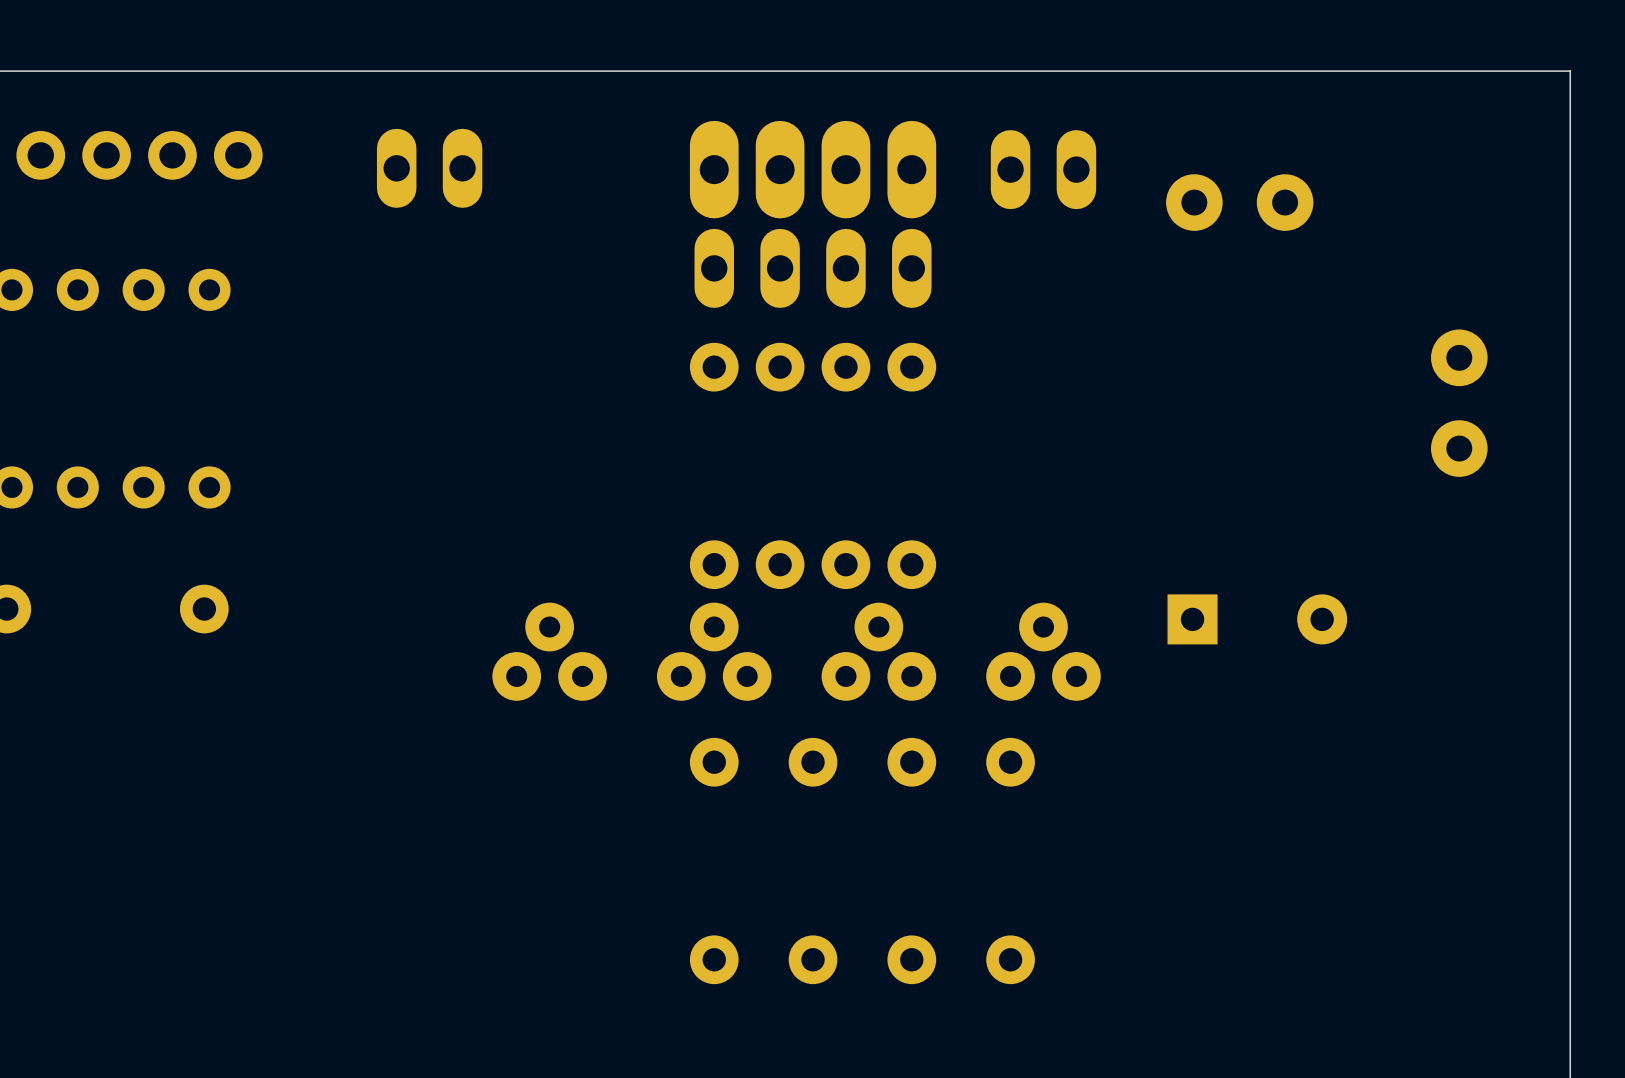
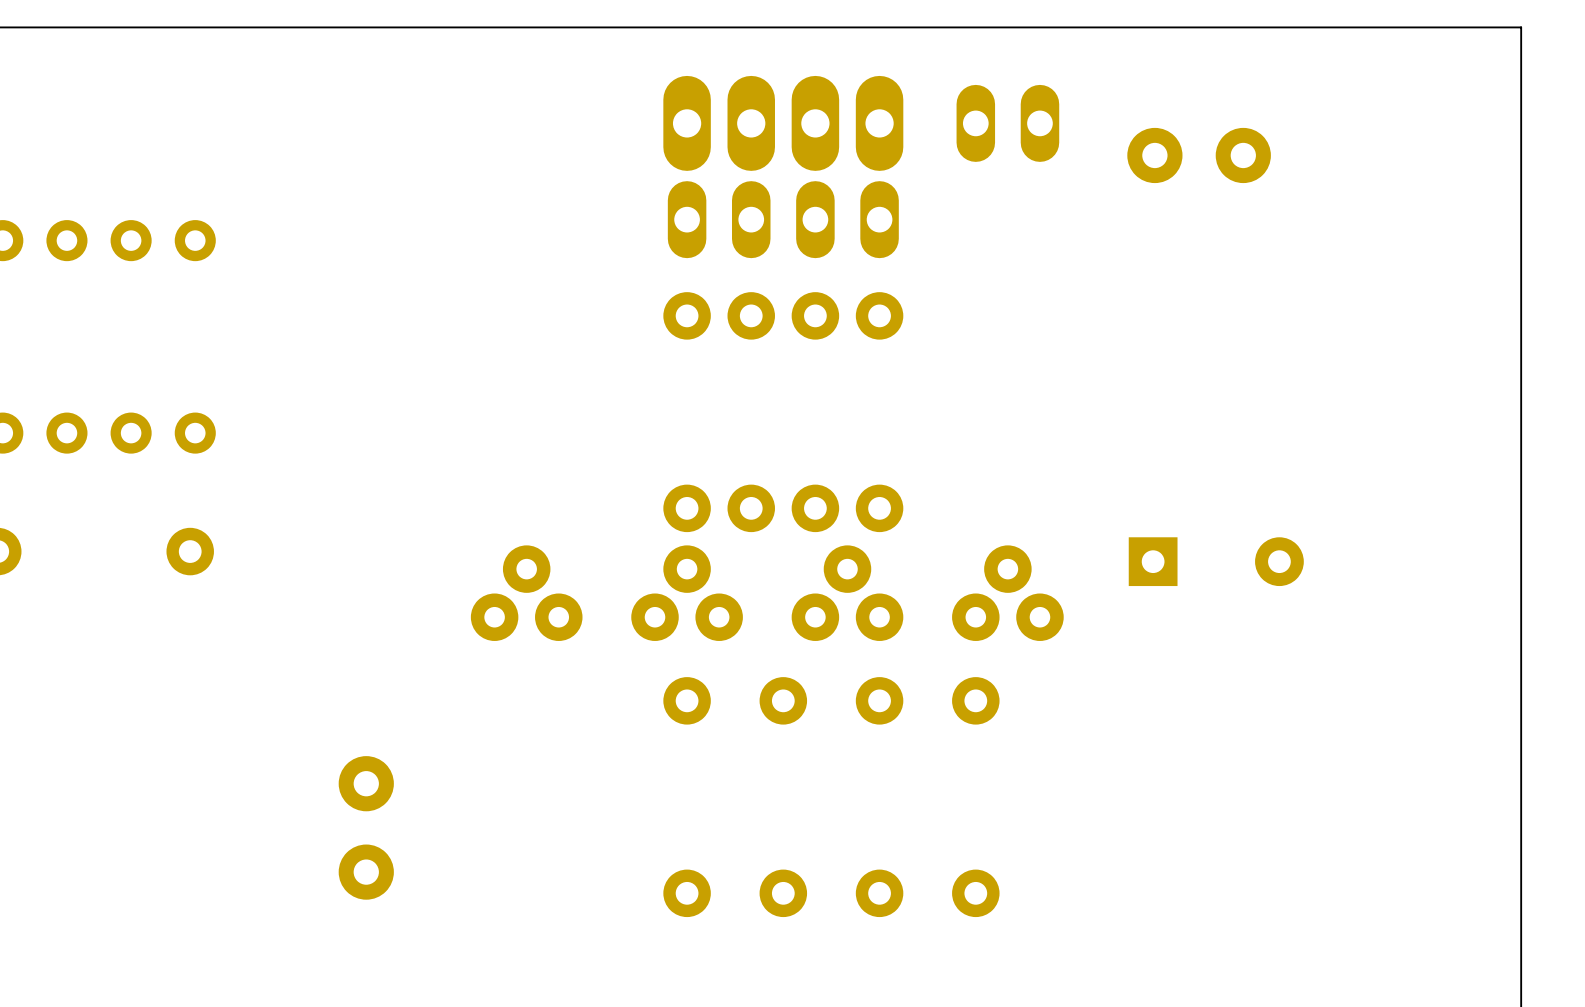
part: (139, 155) -> none
part: (429, 168) -> none
part: (1459, 403) -> none
part: none -> (366, 827)

